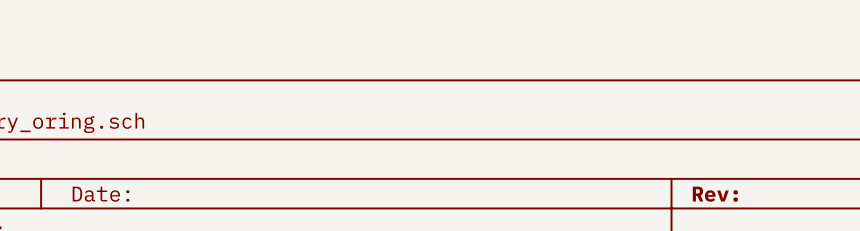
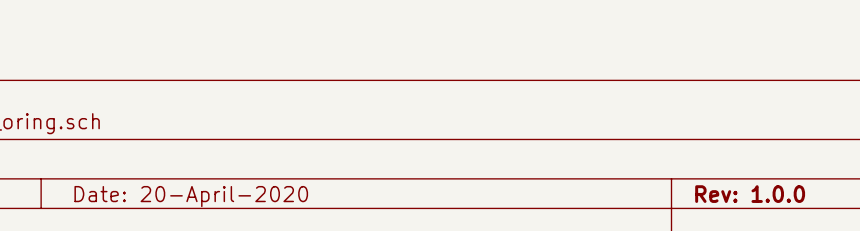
title block: Date: (101, 194) -> Date: 20-April-2020 (191, 196)
title block: Rev: (715, 194) -> Rev: 1.0.0 (750, 194)

